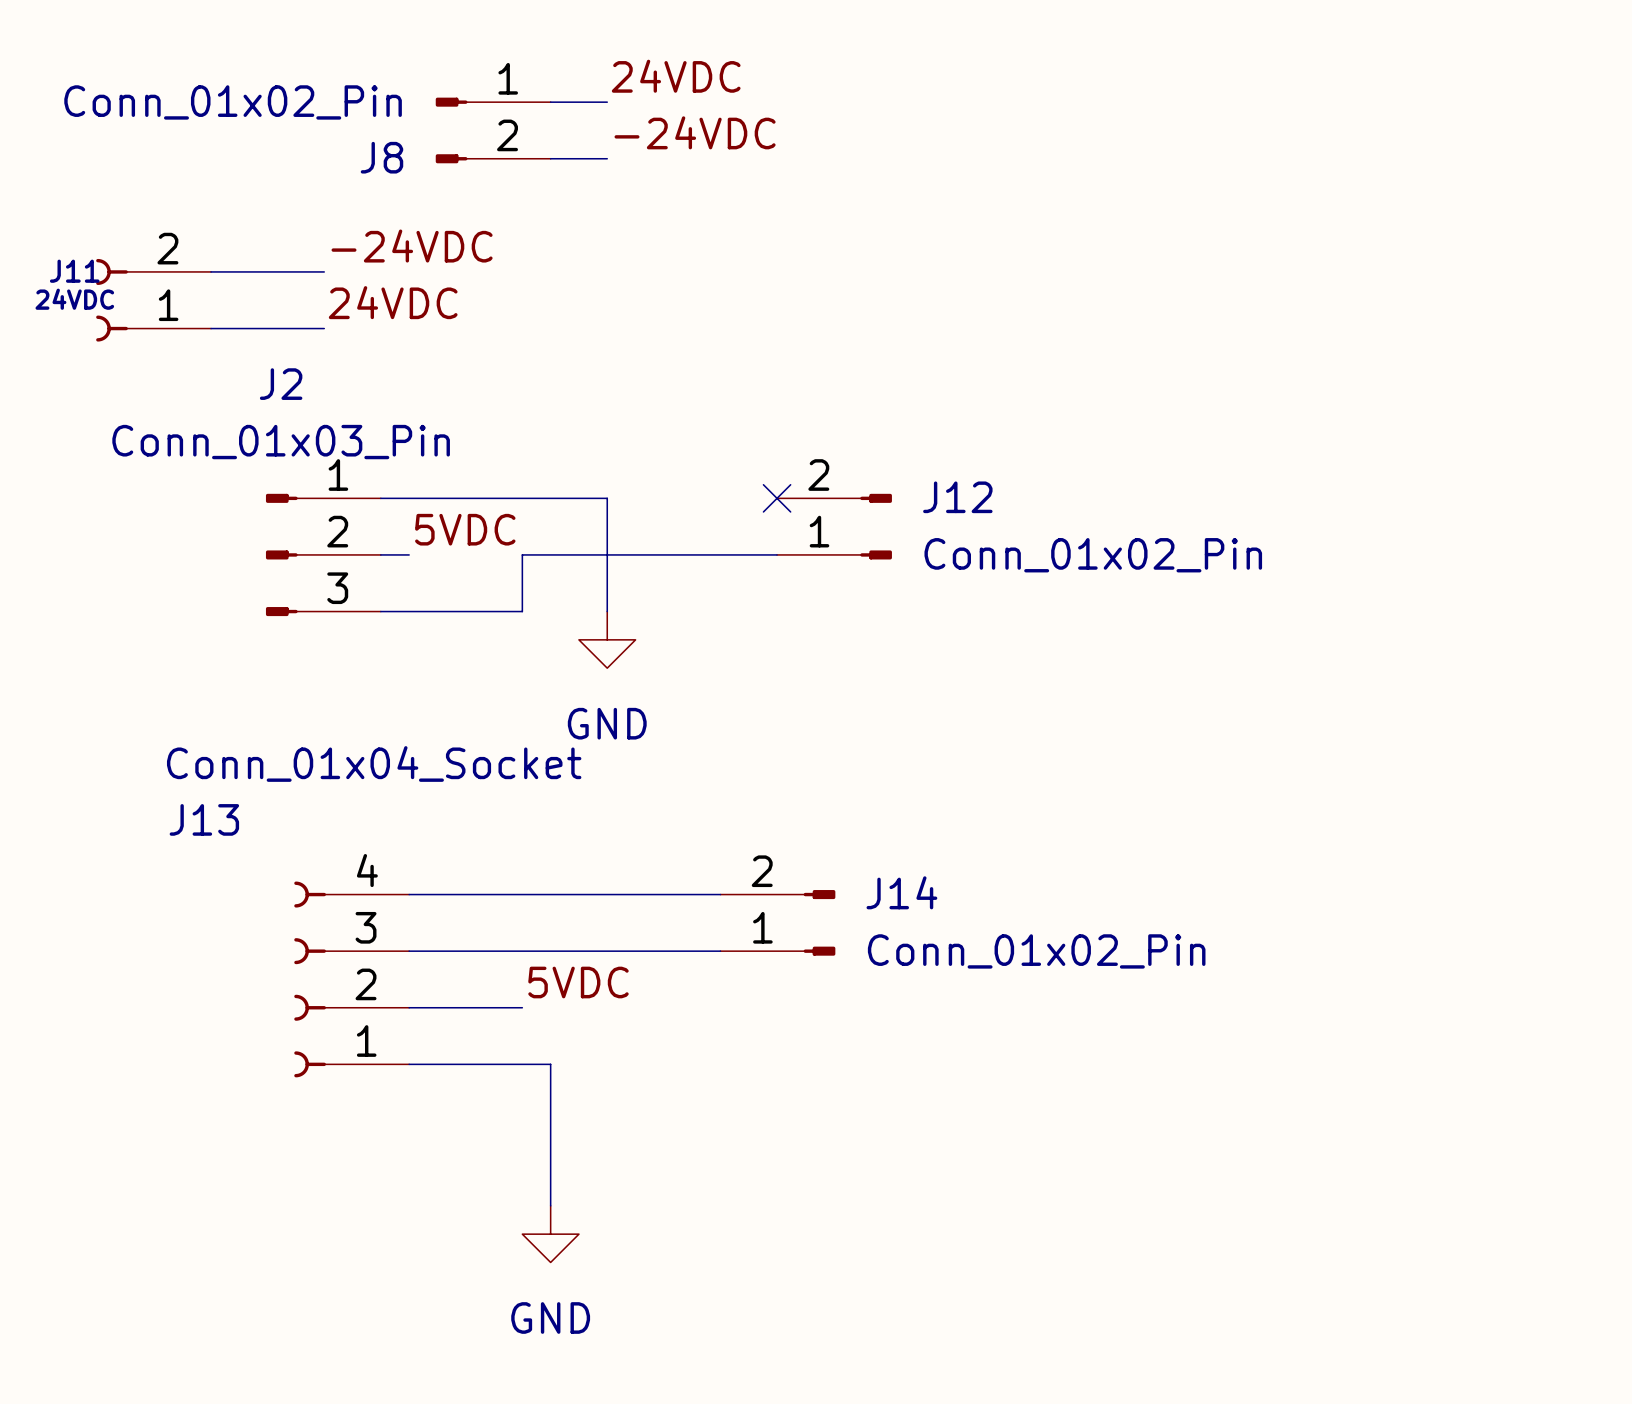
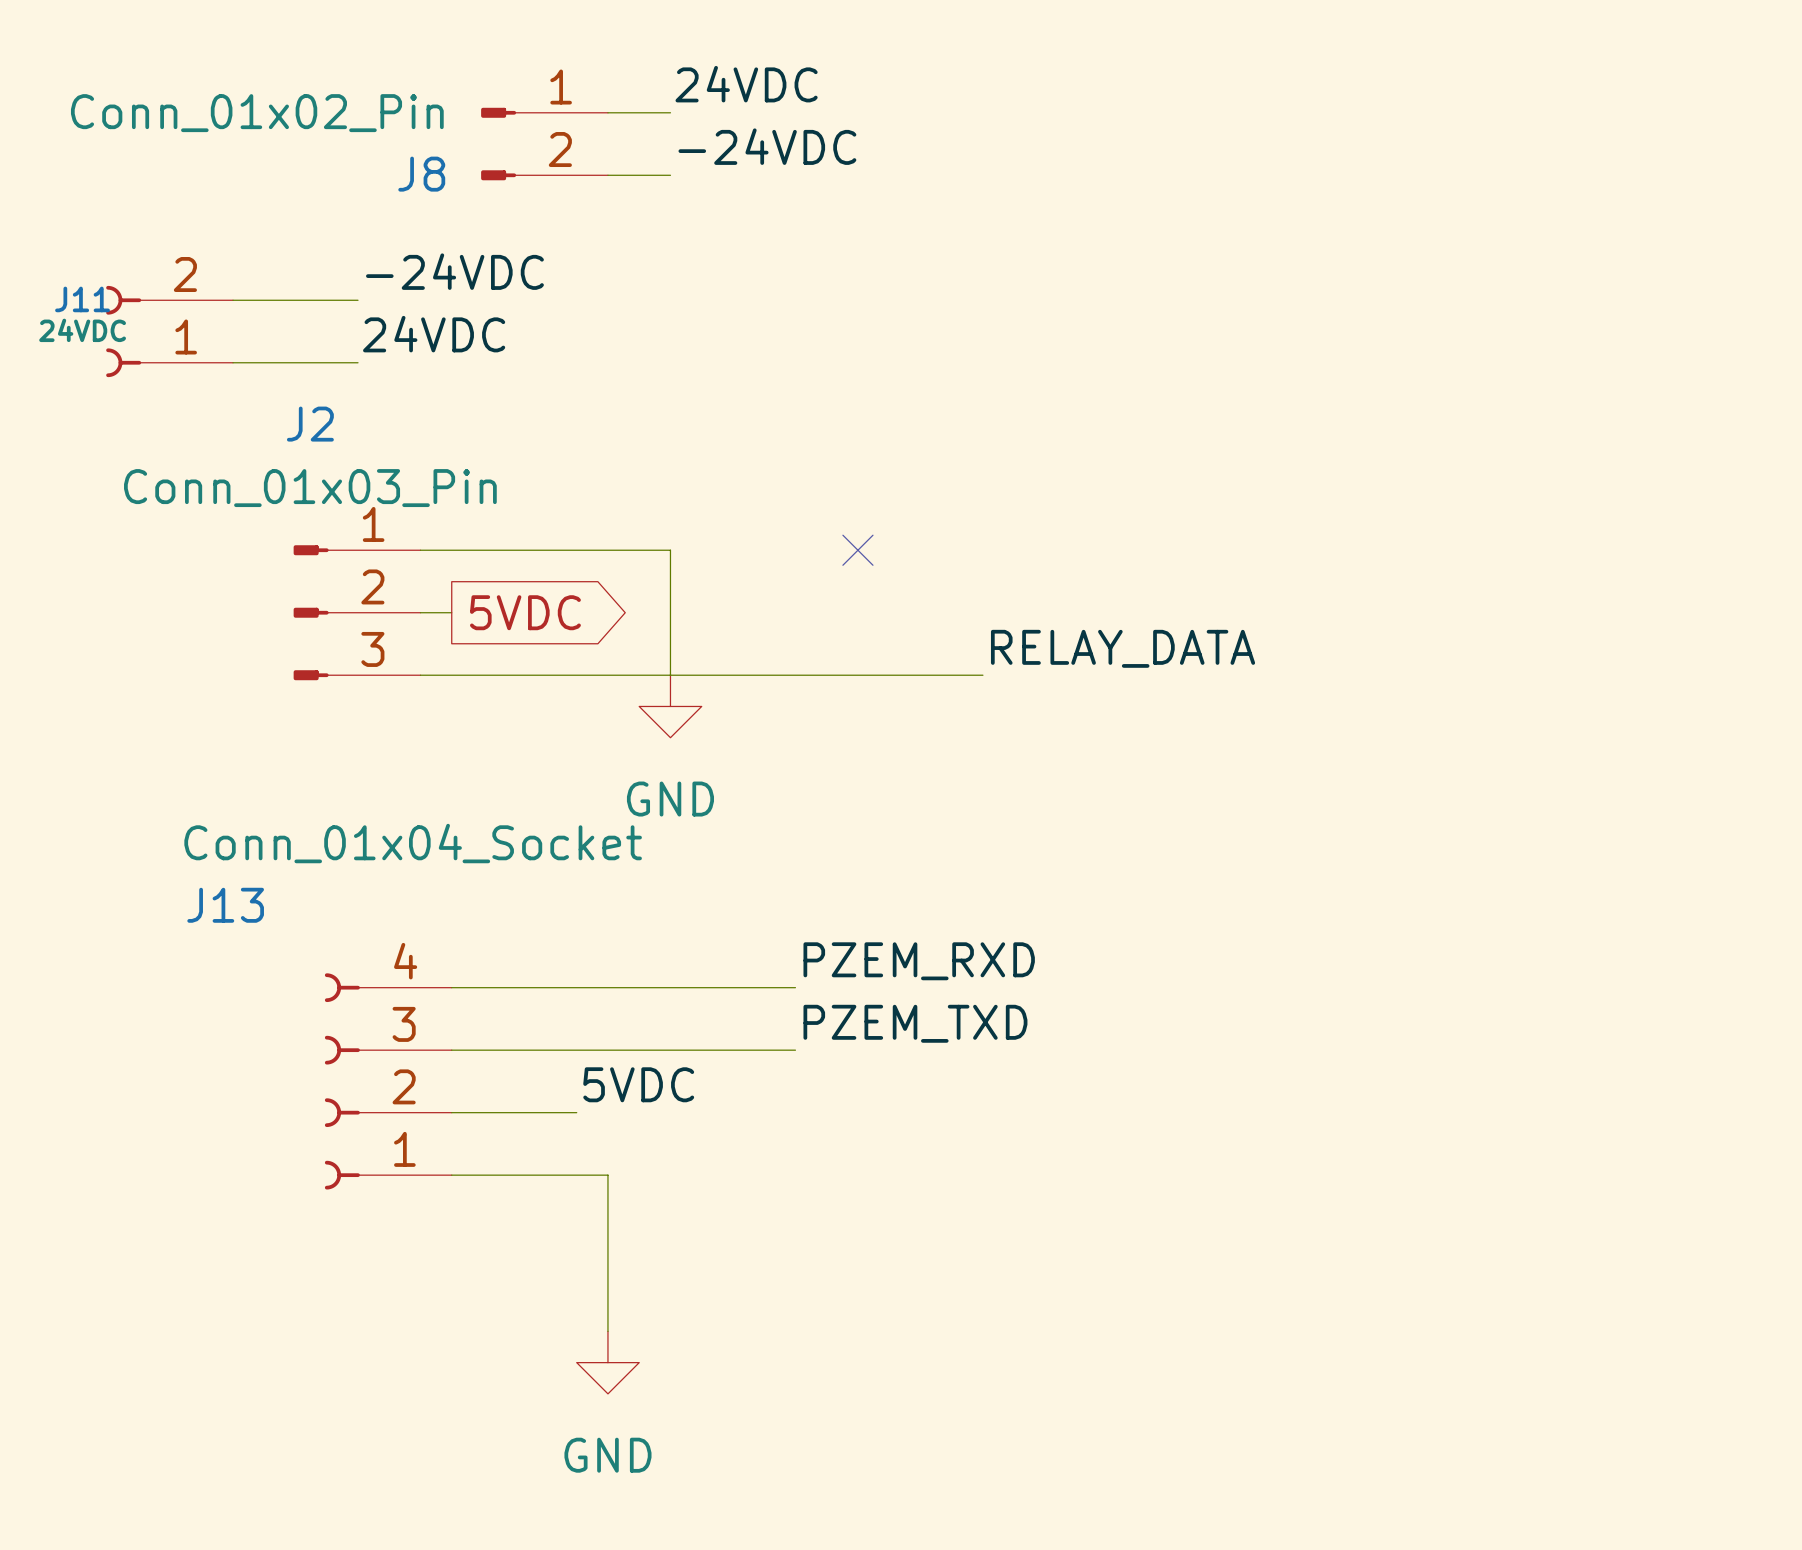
J12: Conn_01x02_Pin (834, 526) -> none
label: 5VDC (465, 529) -> none
global label: none -> 5VDC (525, 612)
wire: (777, 554) (522, 554) (522, 611) -> (982, 675) (576, 675)
label: none -> RELAY_DATA (1123, 648)
label: none -> PZEM_RXD (919, 961)
J14: Conn_01x02_Pin (777, 922) -> none
label: none -> PZEM_TXD (915, 1023)

